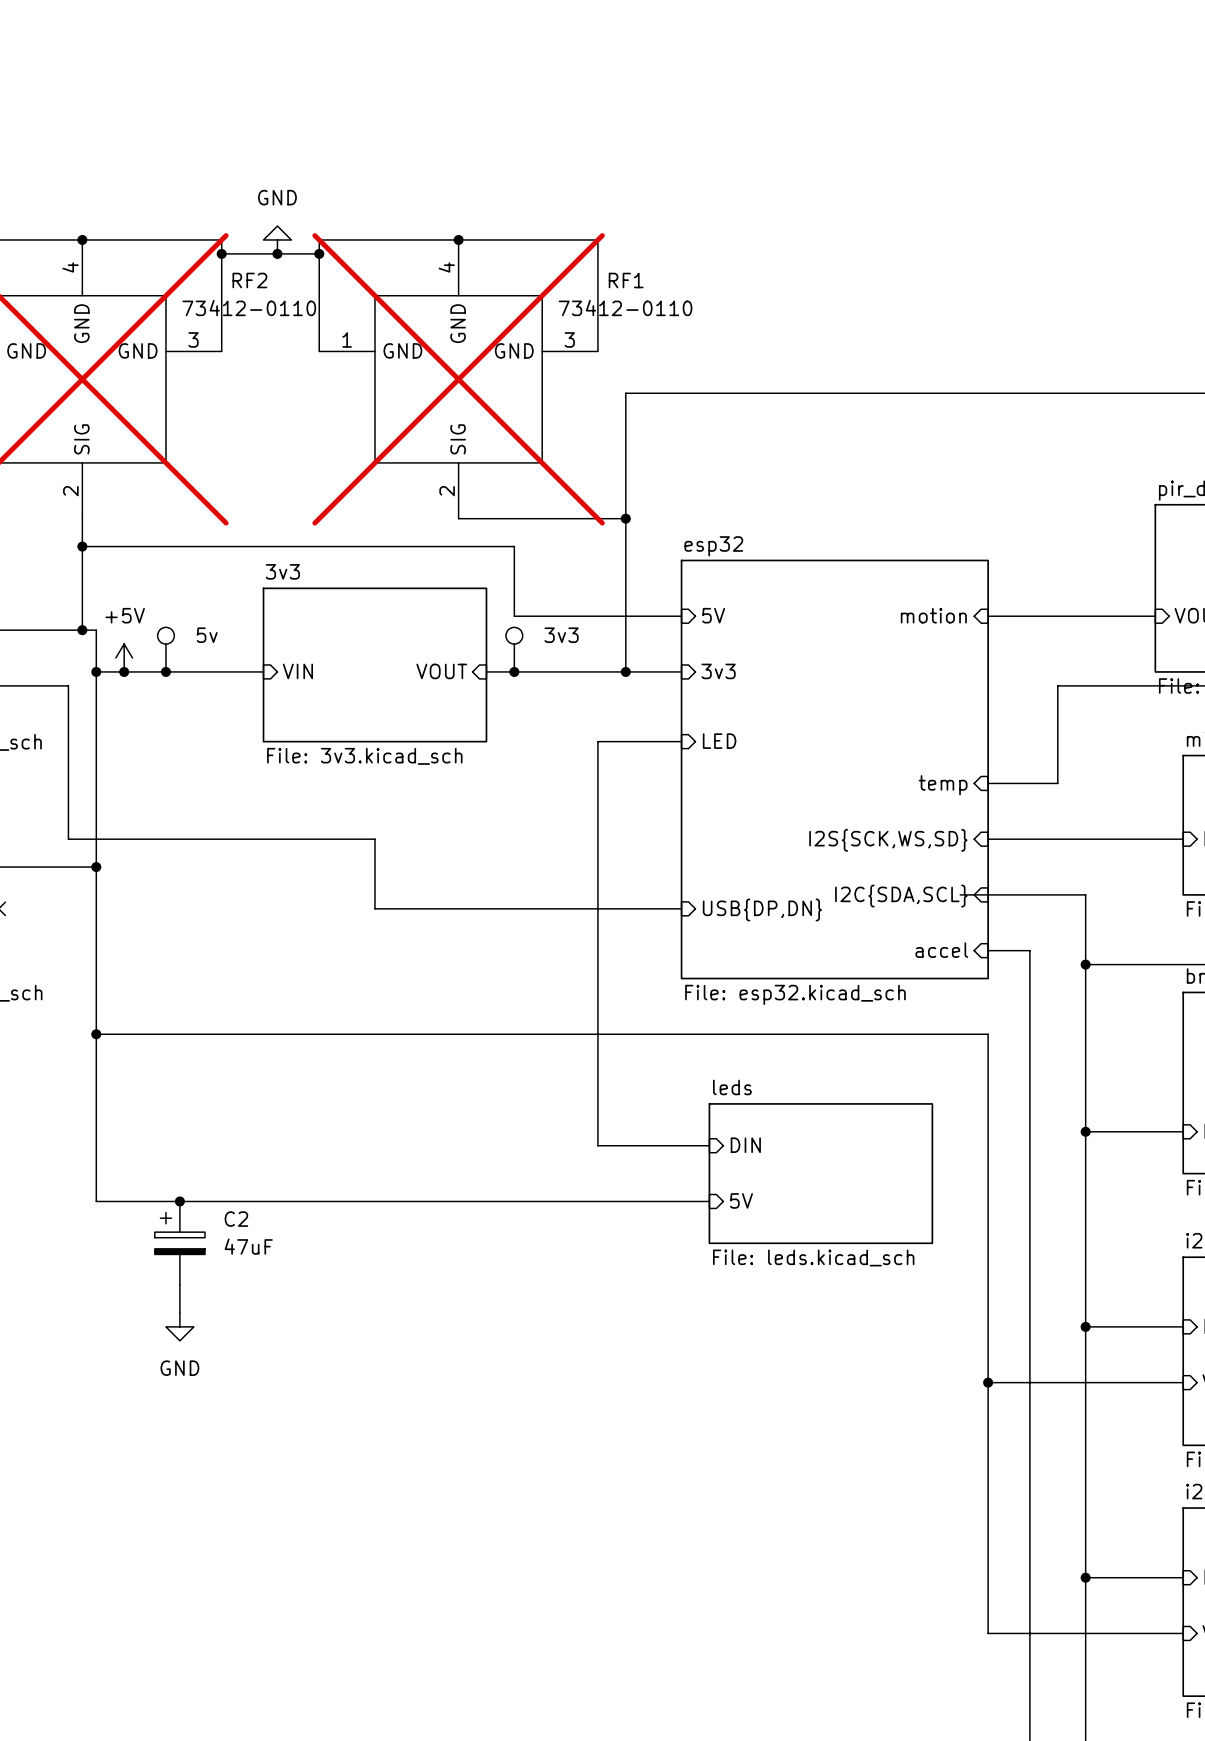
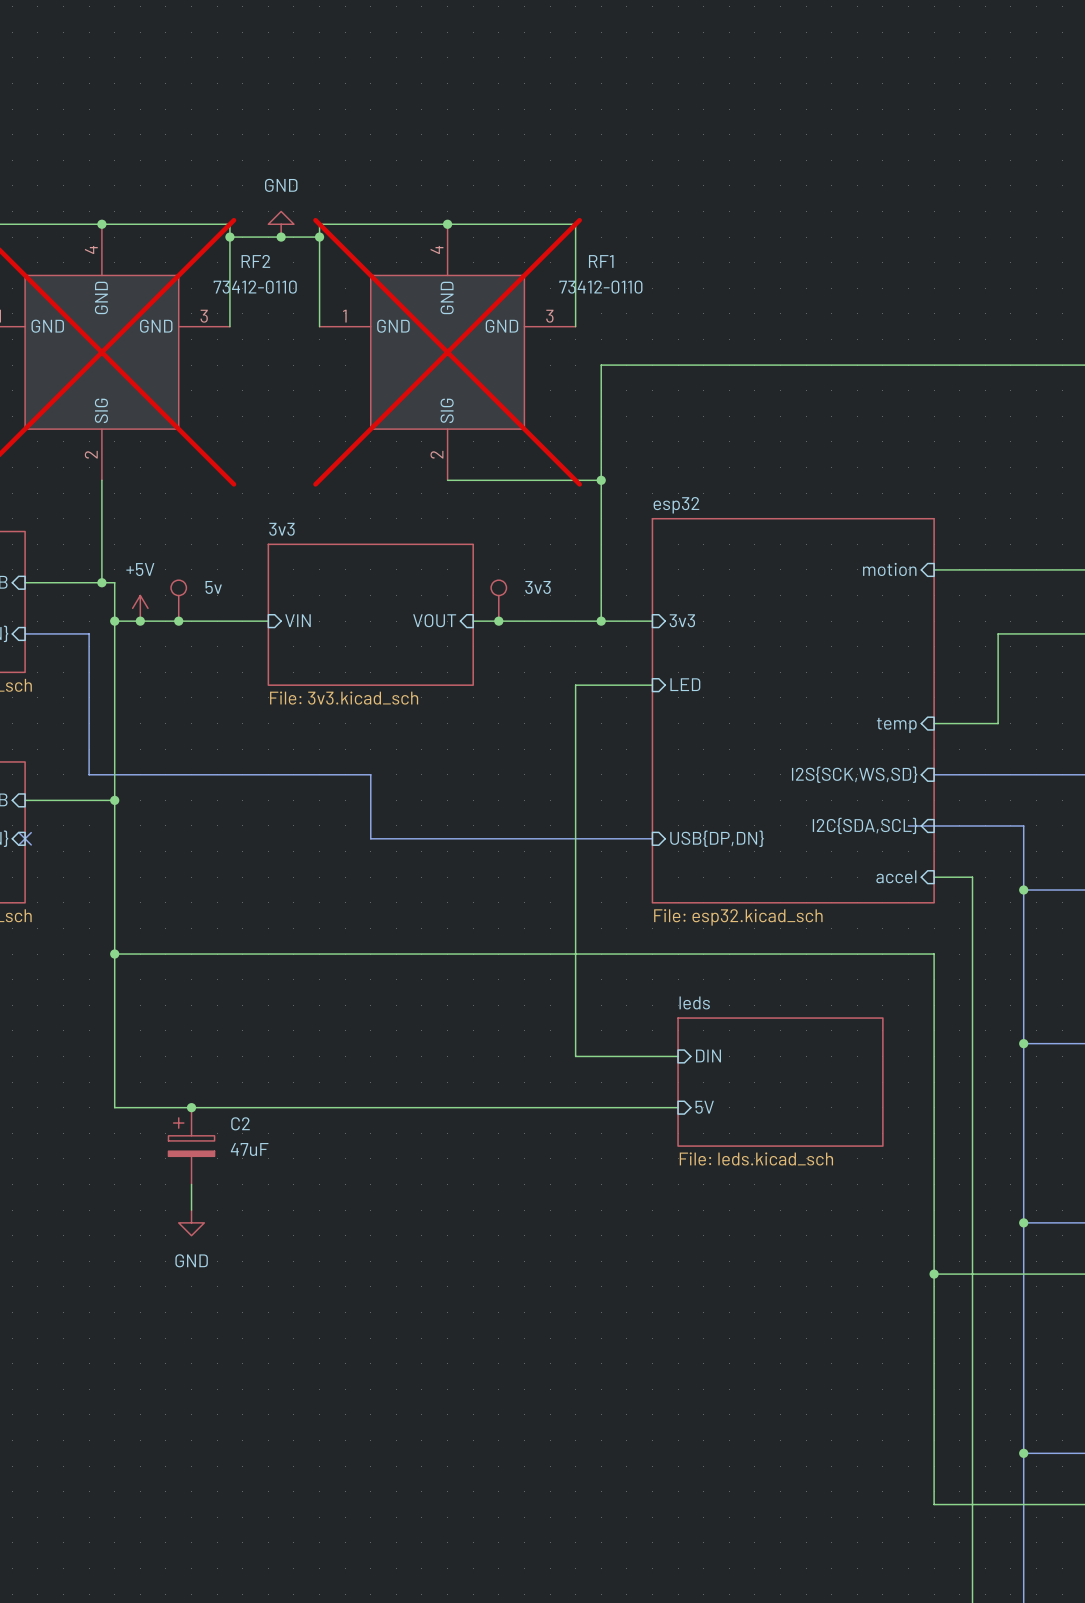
wire: (82, 546) (514, 546) (514, 616) (681, 616) -> none
junction: (82, 546) -> none
sheet pin: 5V (713, 615) -> none

